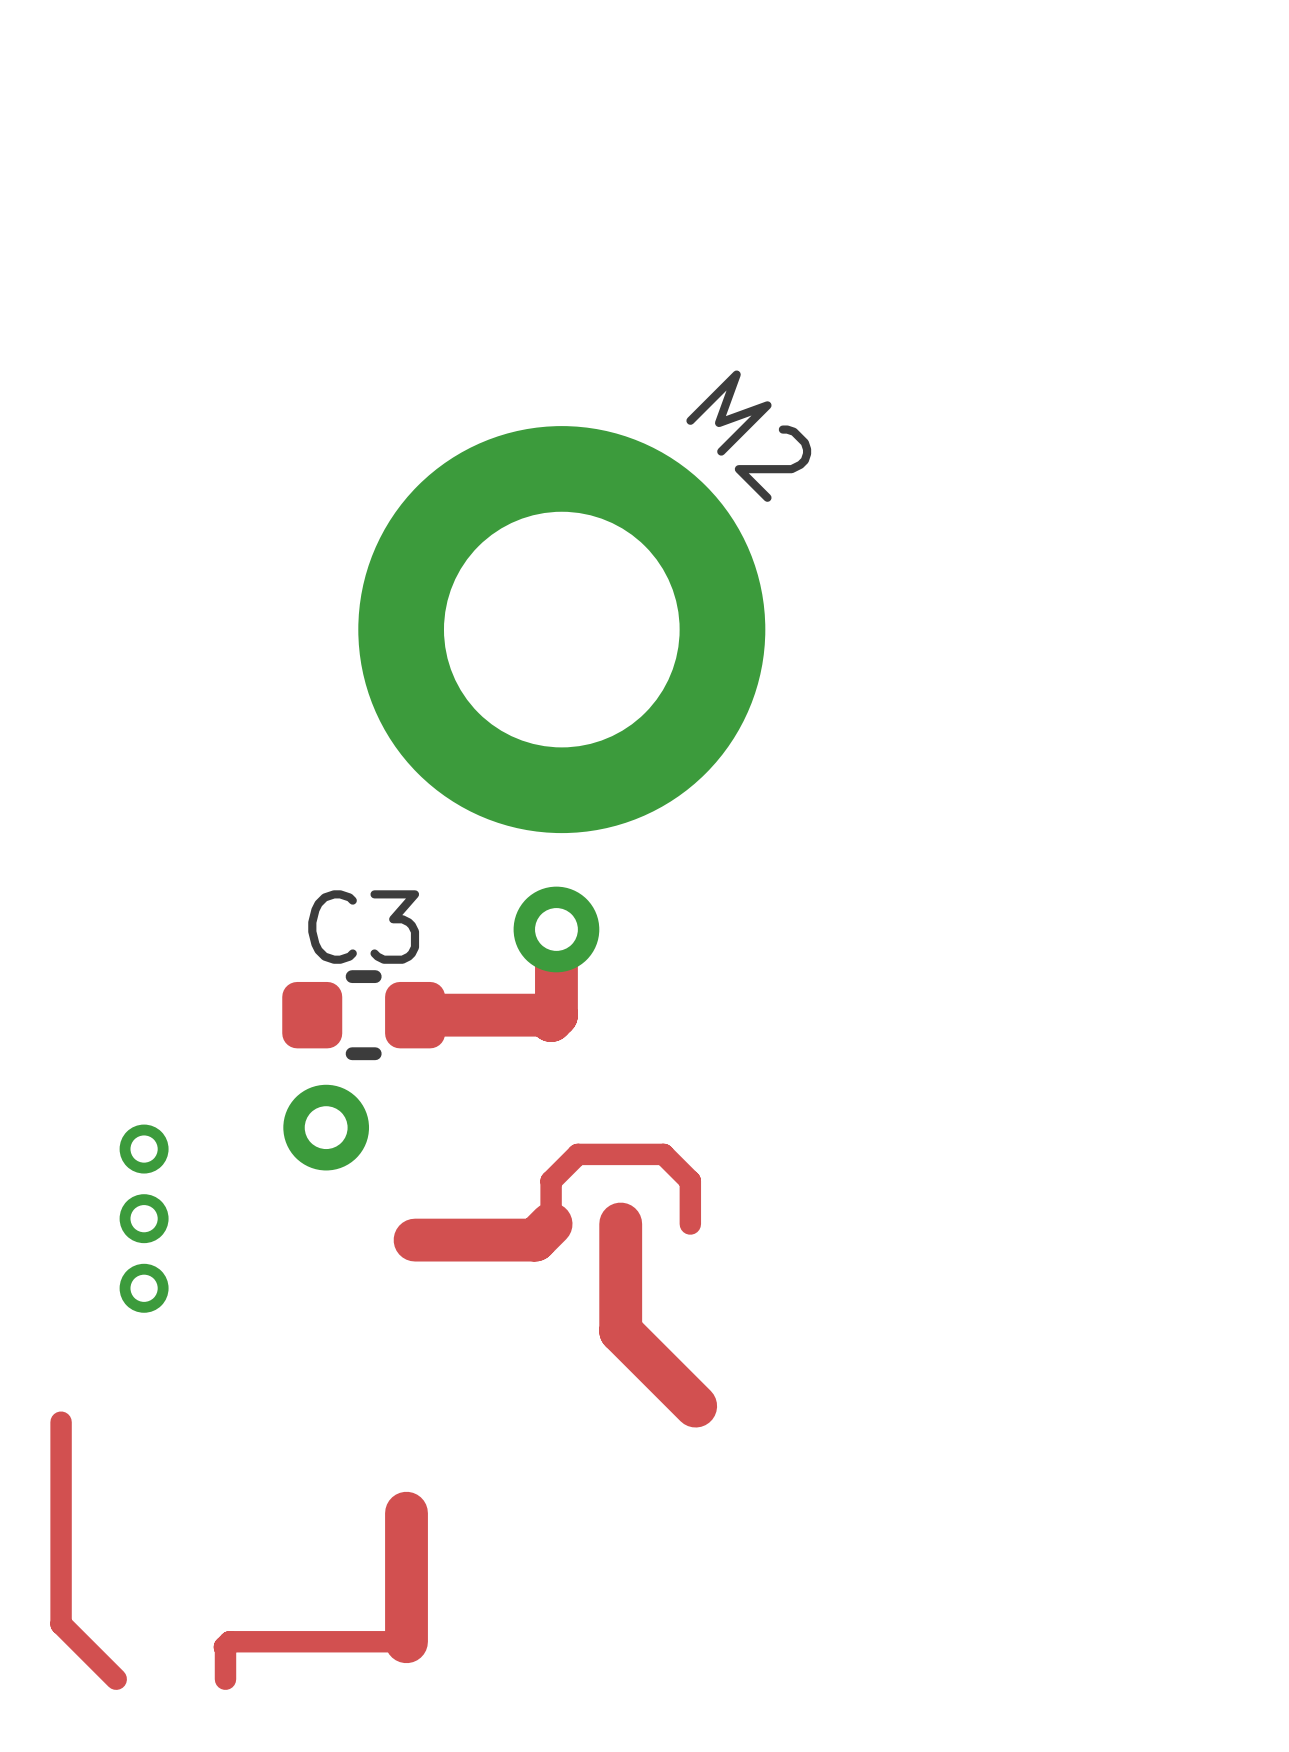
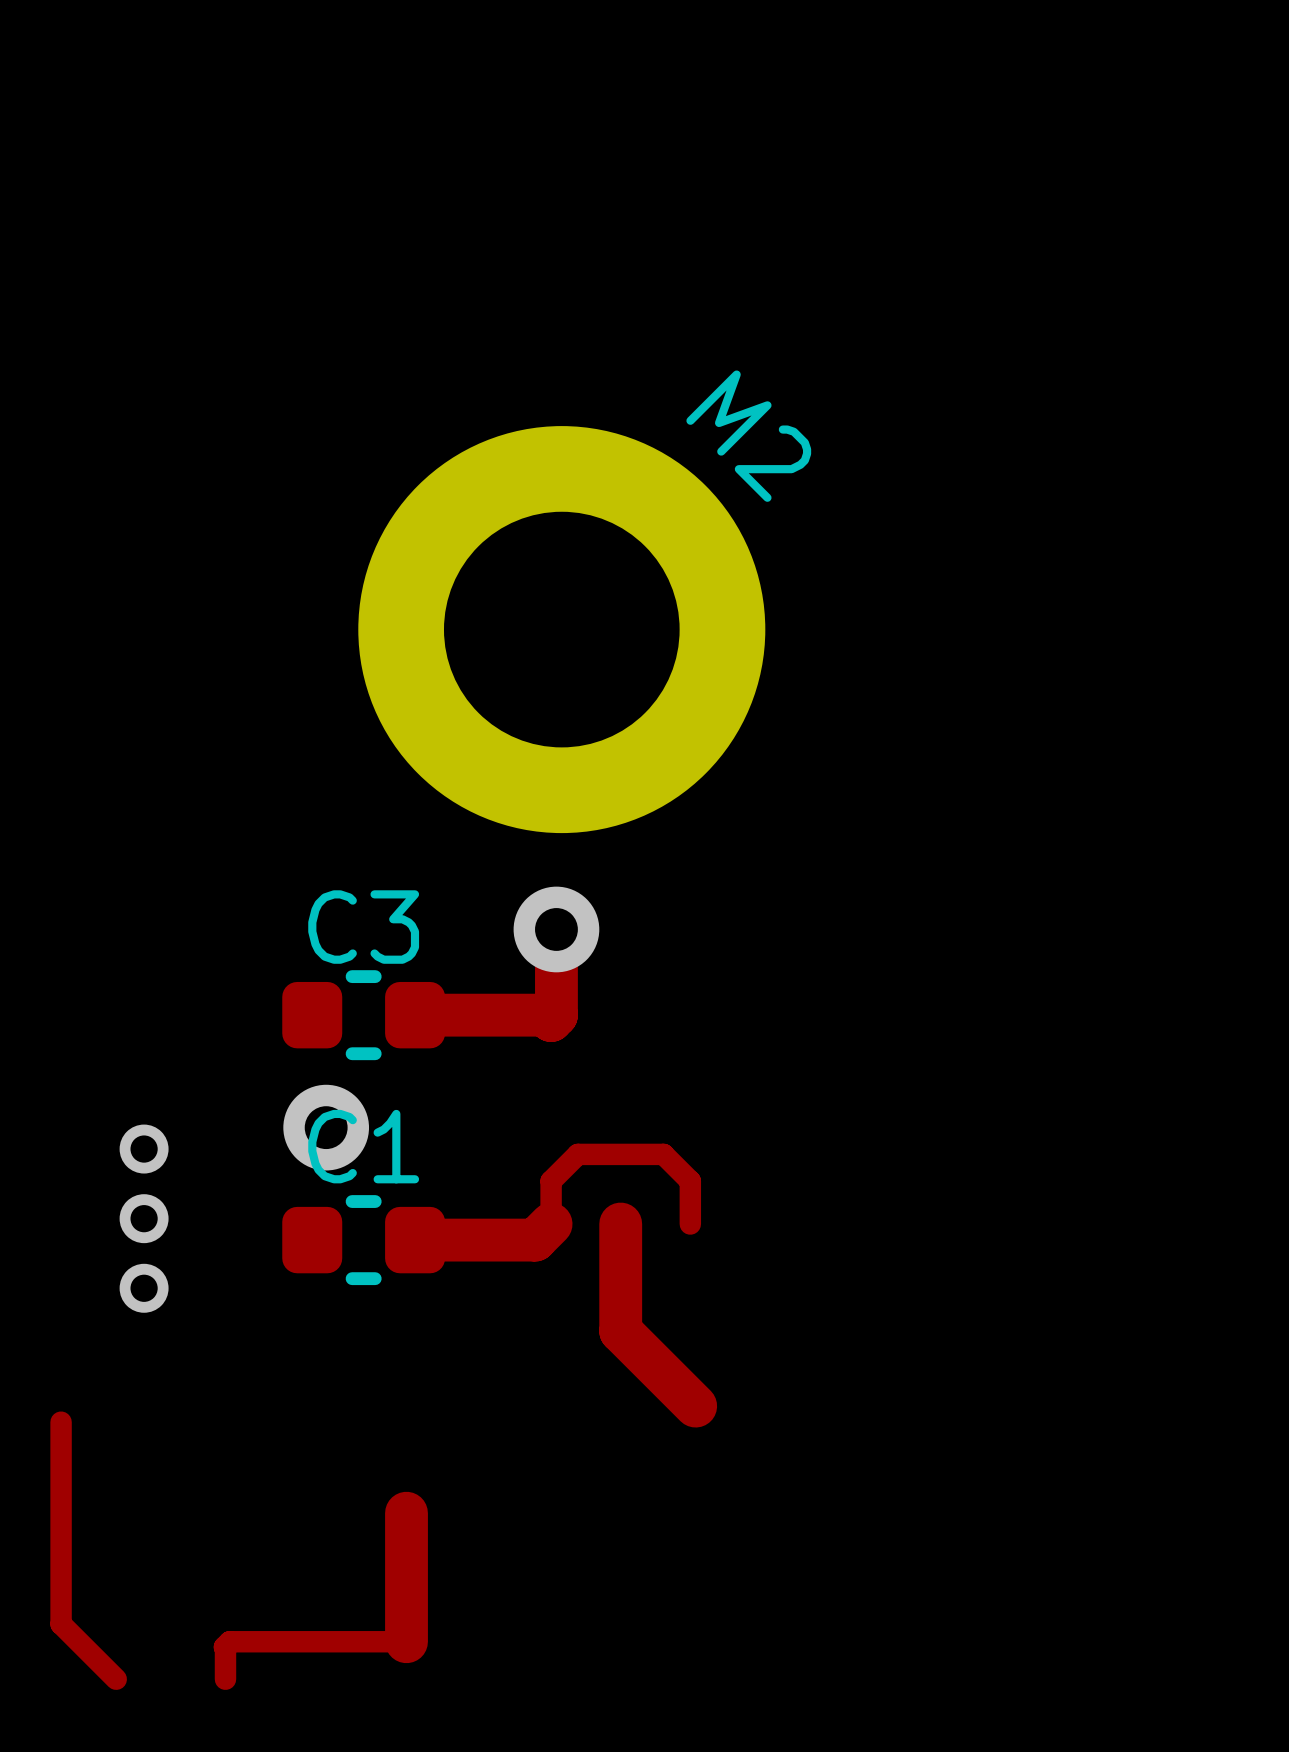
C1: none -> (363, 1240)

